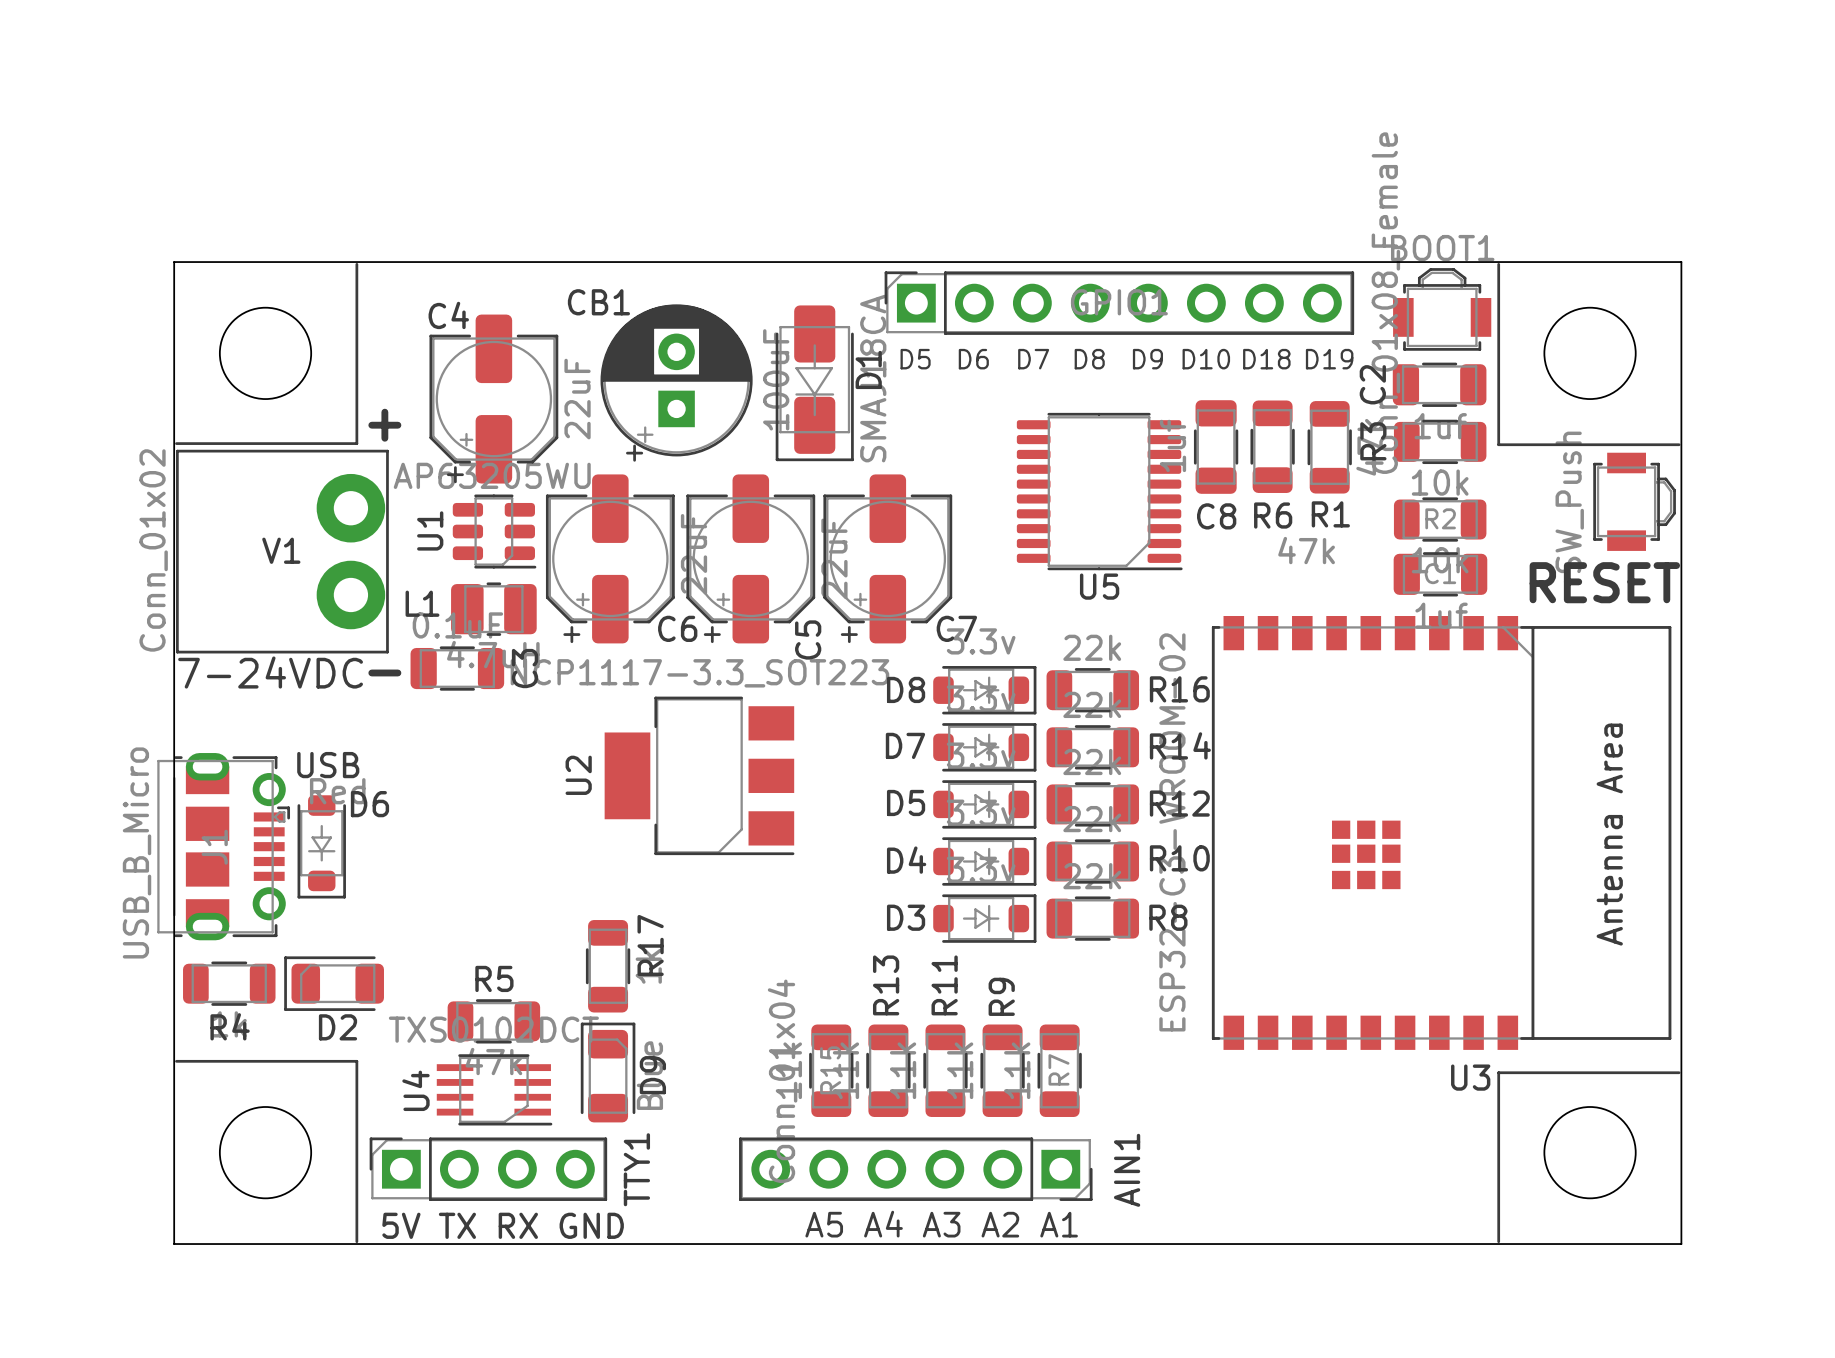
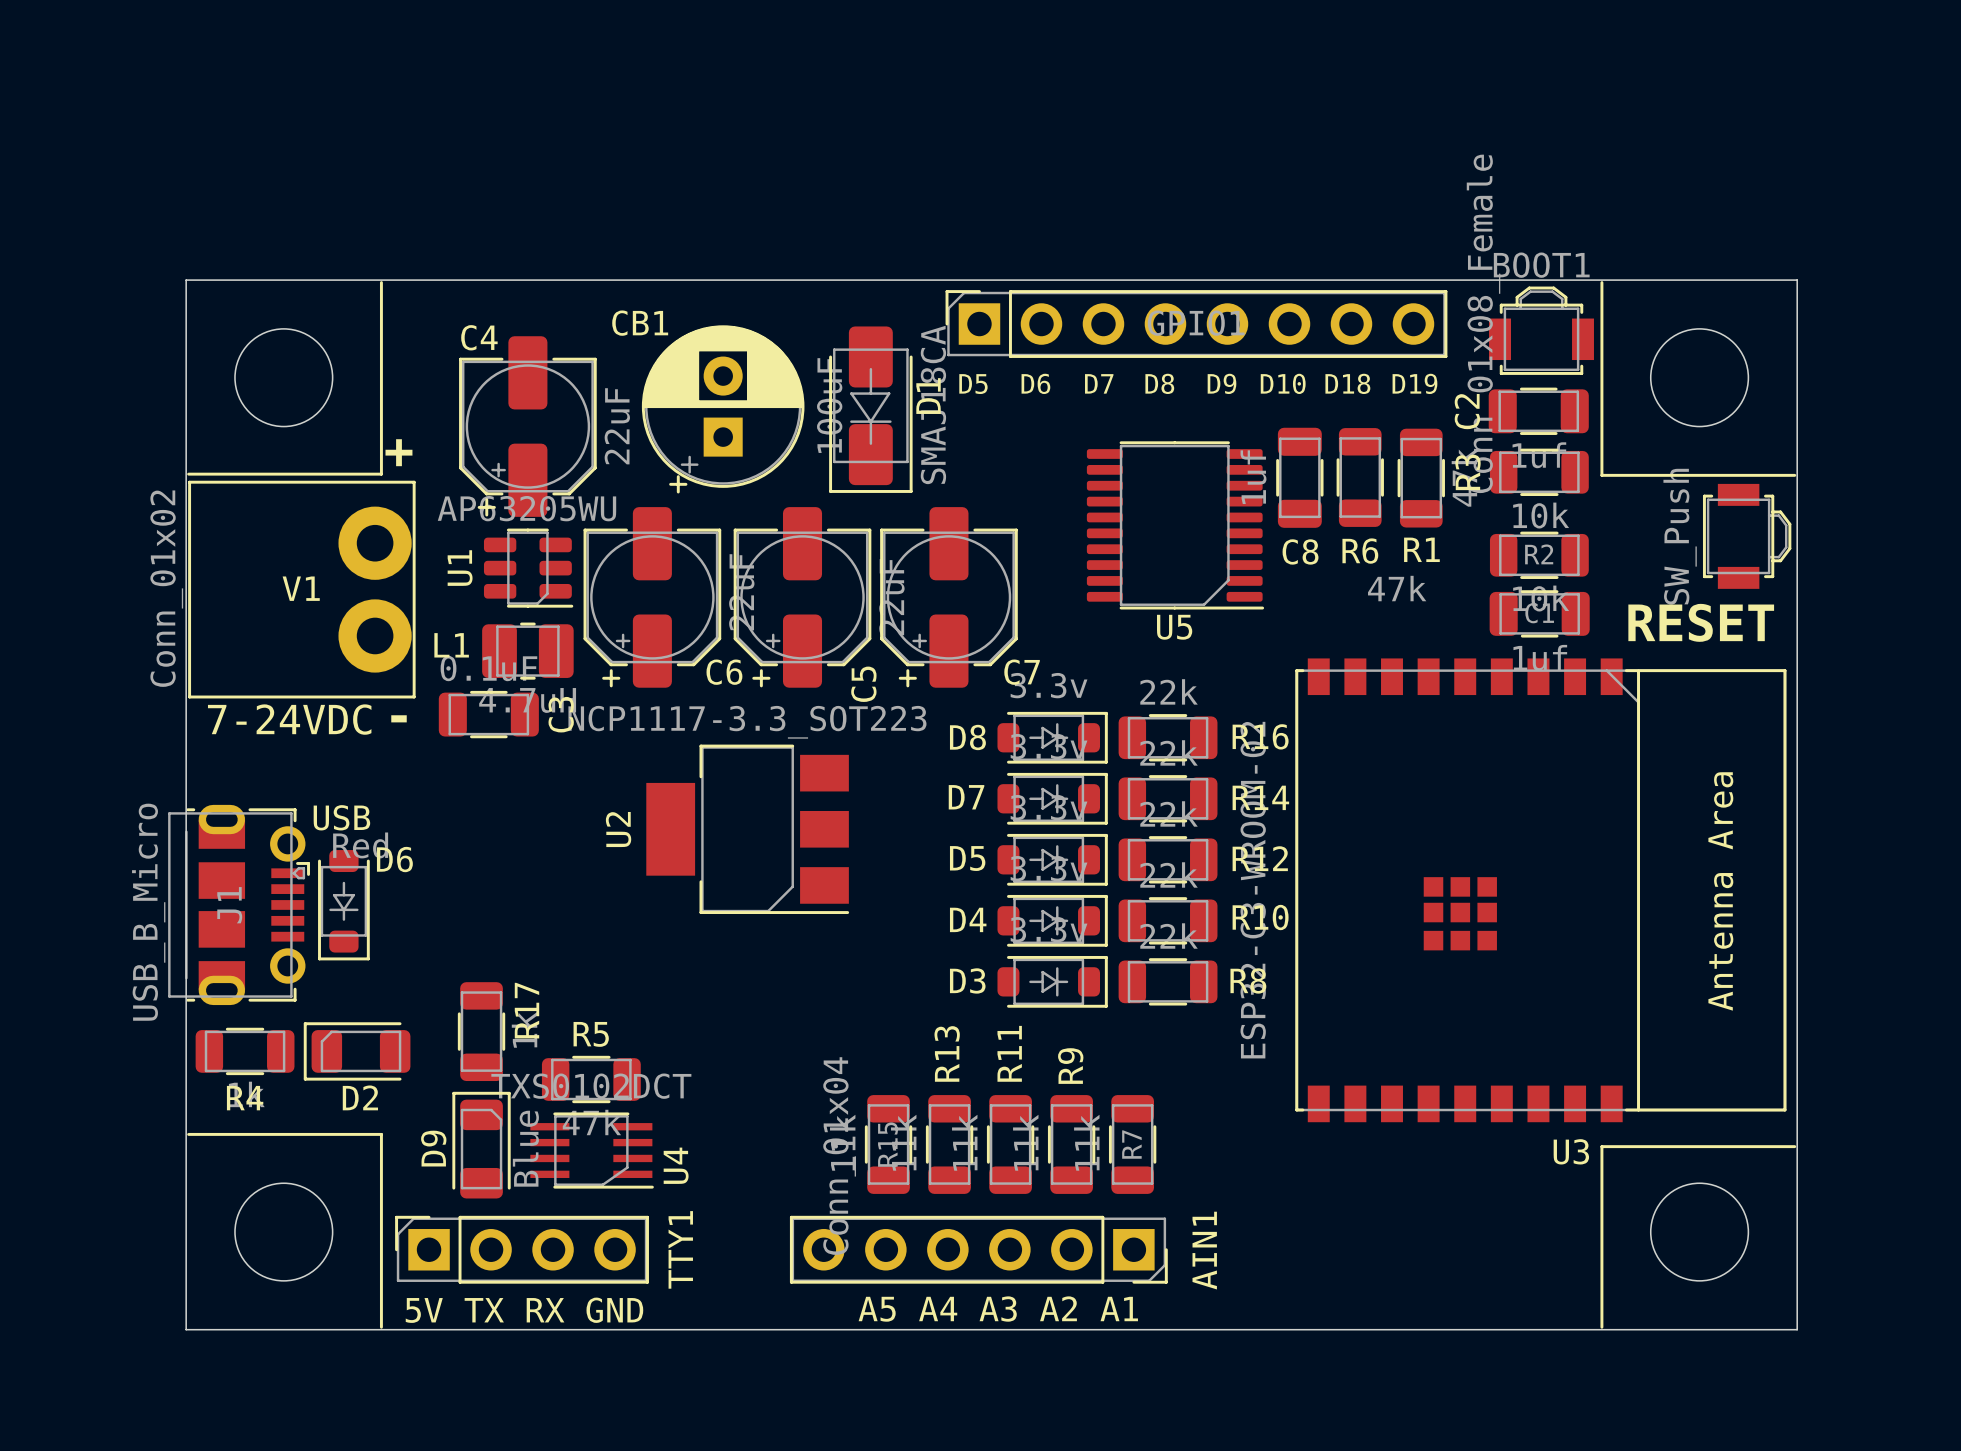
R17 position: (608, 966) -> (481, 1031)
R5 position: (493, 1021) -> (591, 1079)
D9 position: (608, 1072) -> (481, 1145)
D9 name position: D9 (652, 1075) -> D9 (433, 1148)
U4 position: (494, 1089) -> (592, 1150)
U4 name position: U4 (415, 1090) -> U4 (676, 1165)

